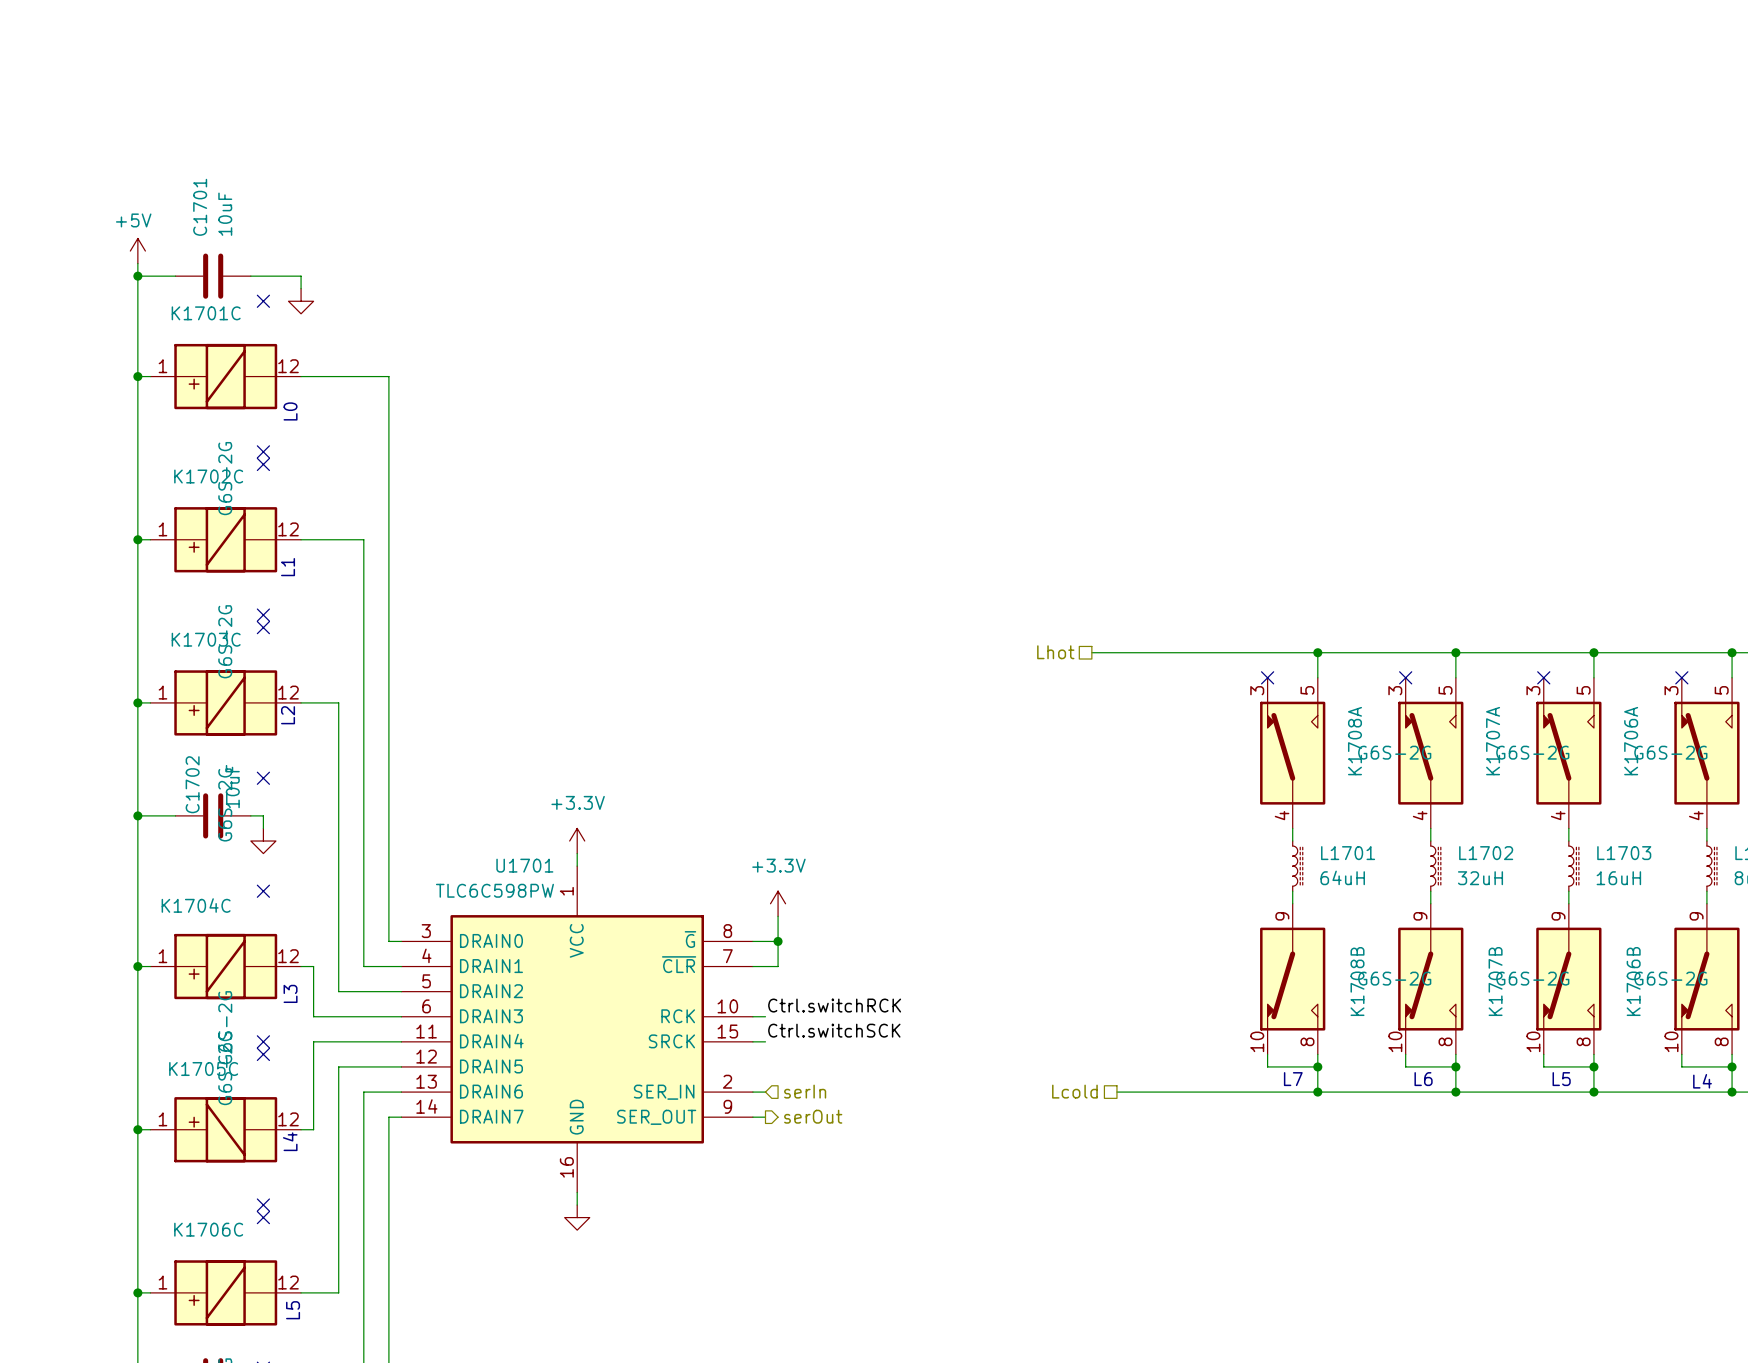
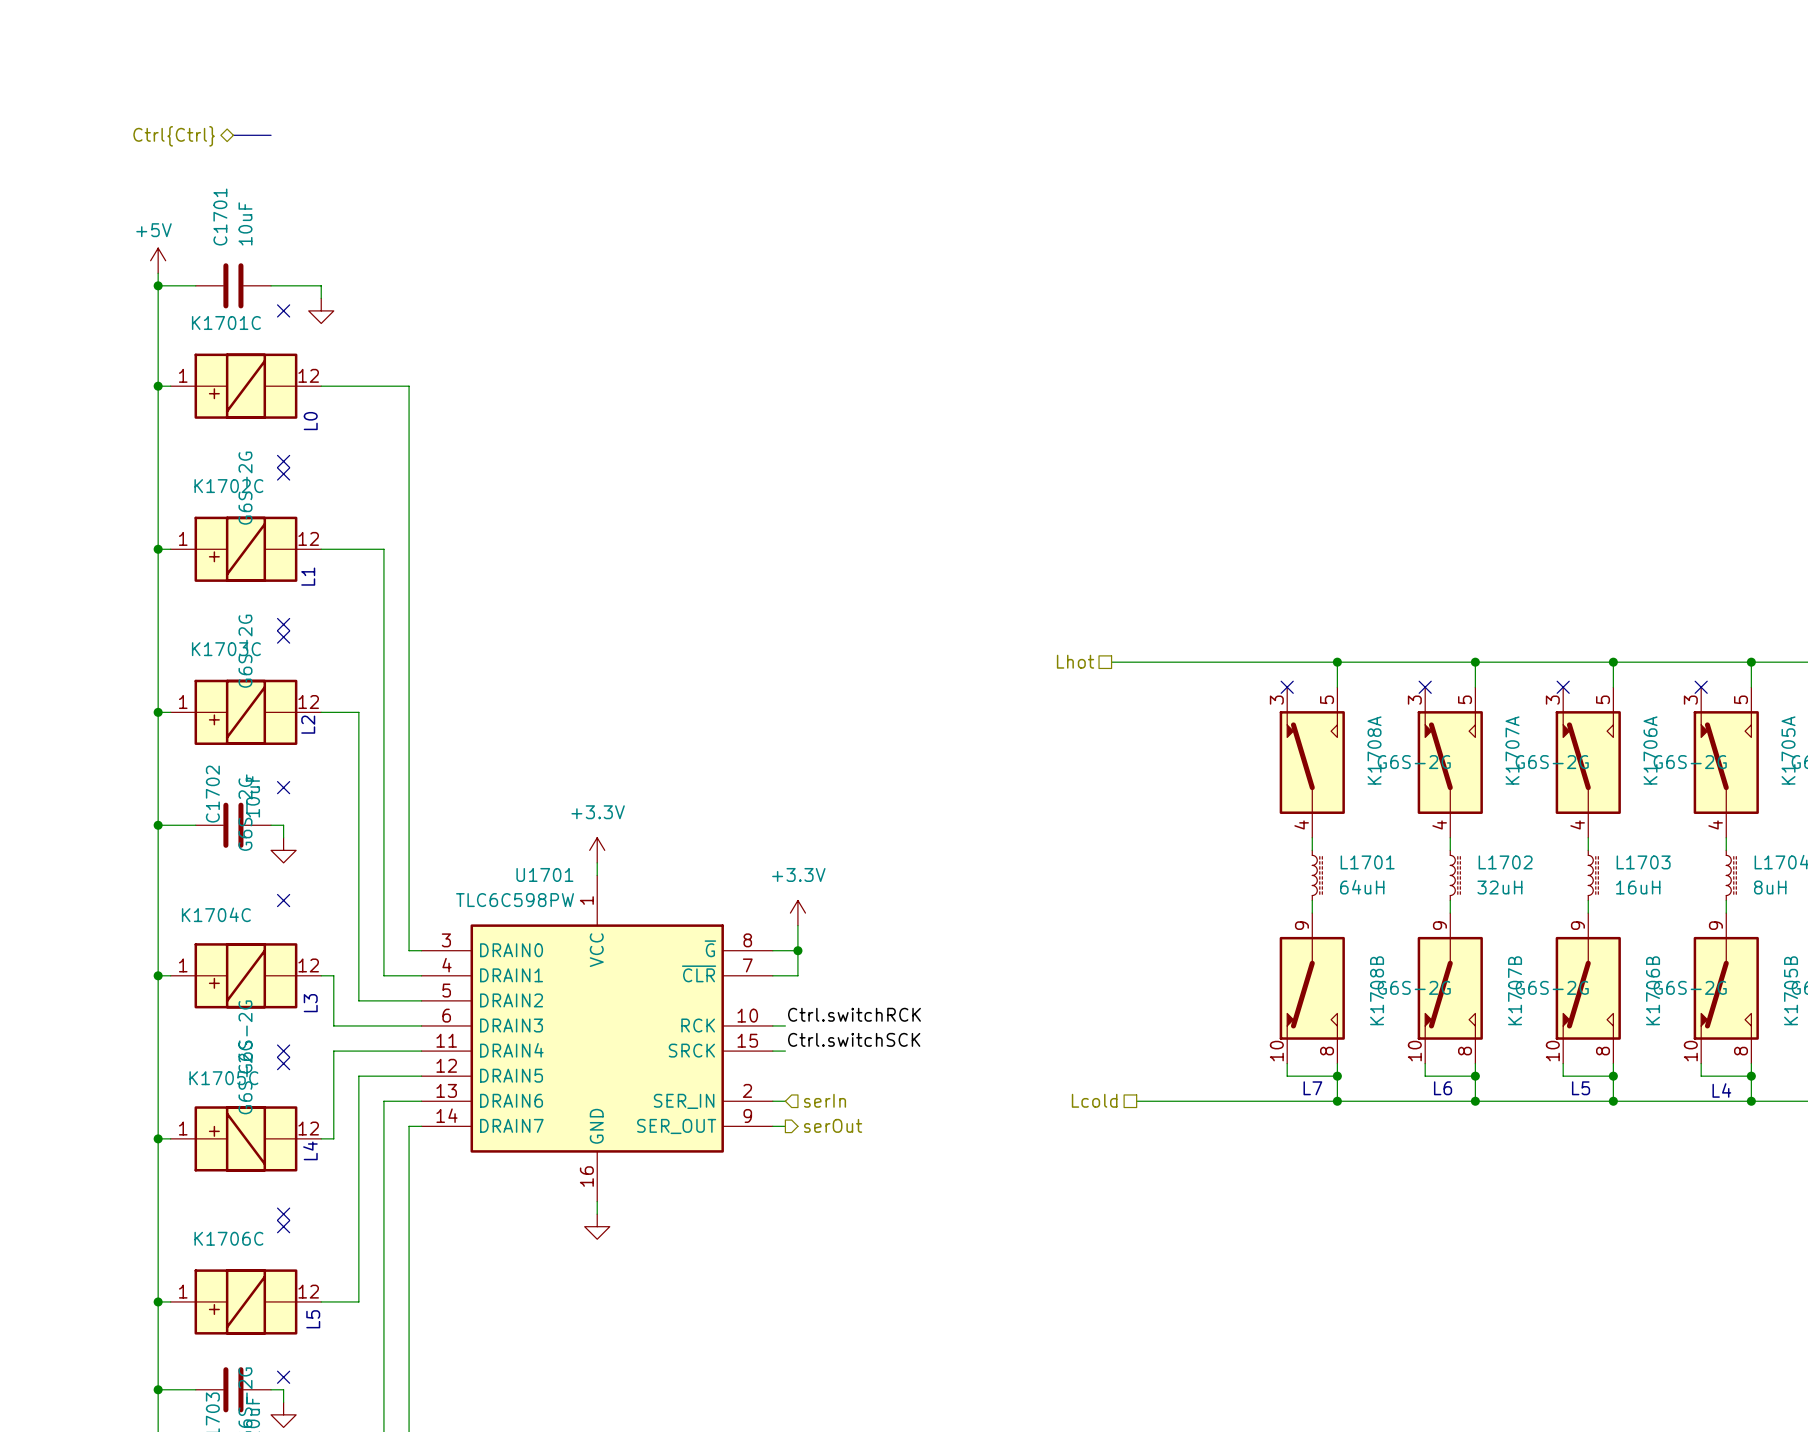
bus: none -> (233, 135) (271, 135)
hierarchical label: none -> Ctrl{Ctrl} (174, 136)

